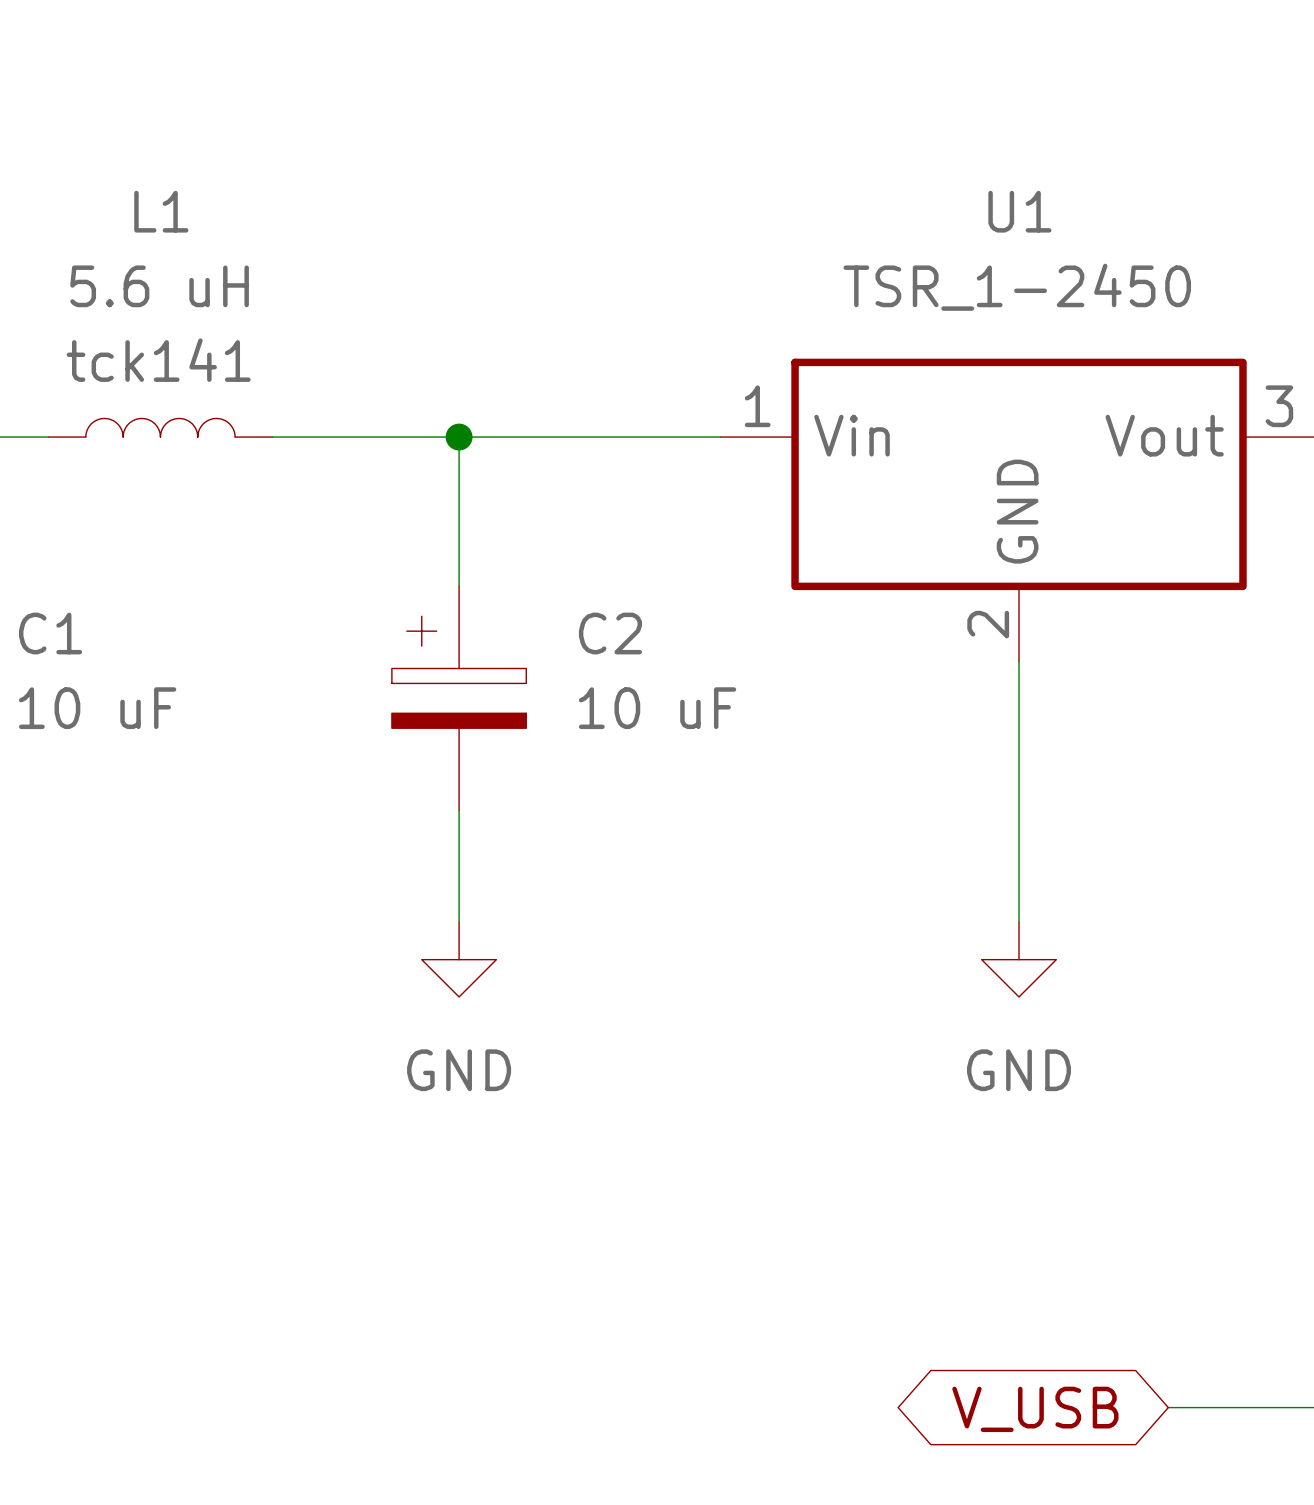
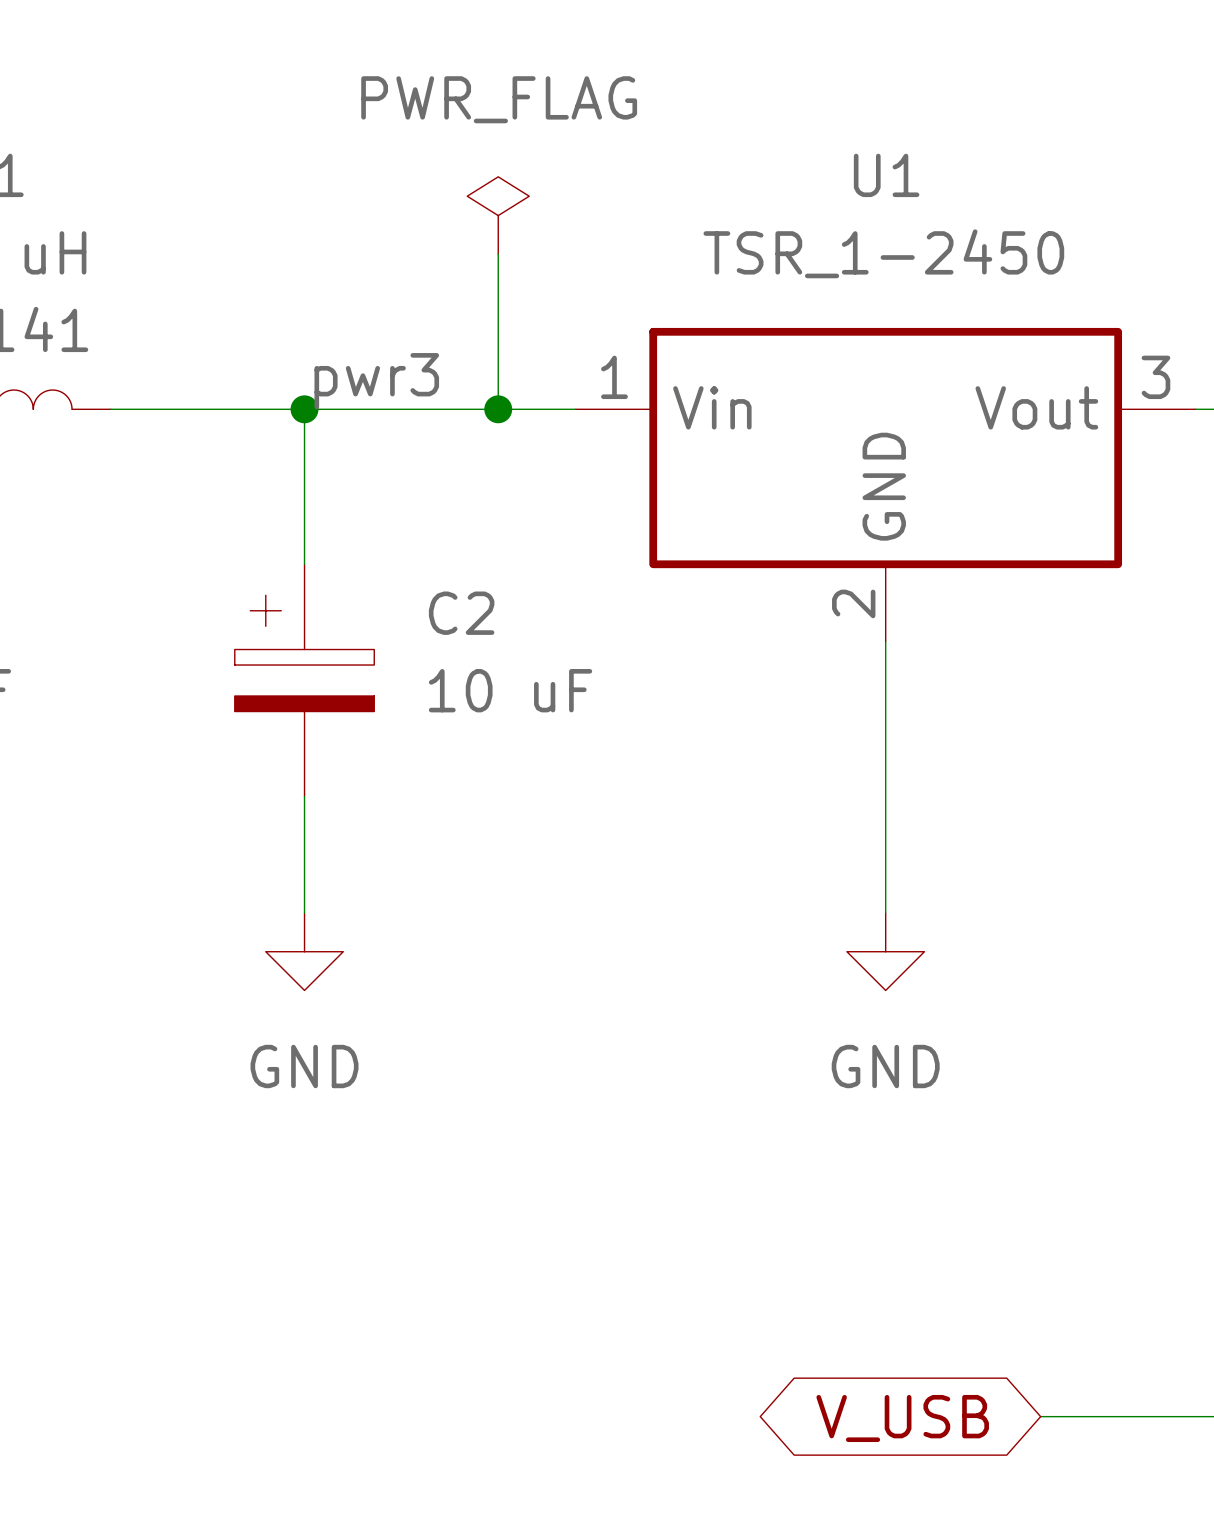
power symbol: none -> PWR_FLAG (498, 215)
wire: none -> (498, 254) (498, 409)
label: none -> pwr3 (376, 381)
junction: none -> (498, 409)

